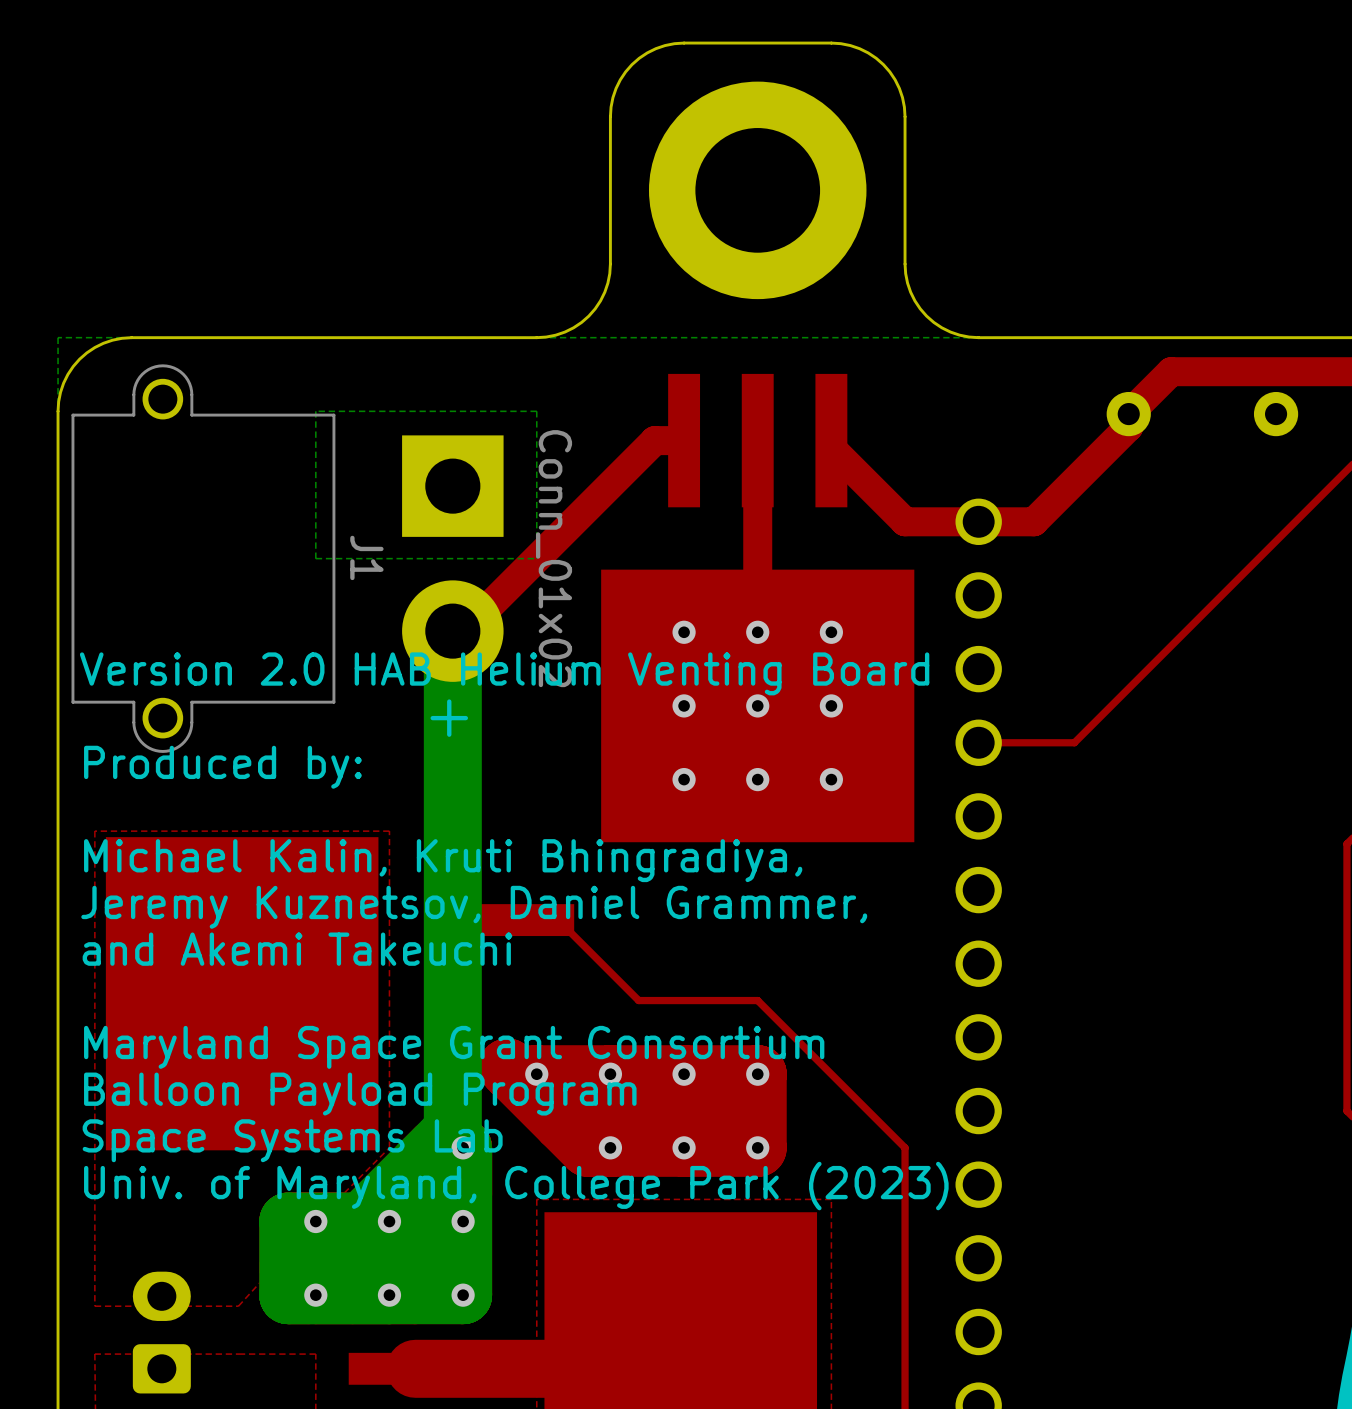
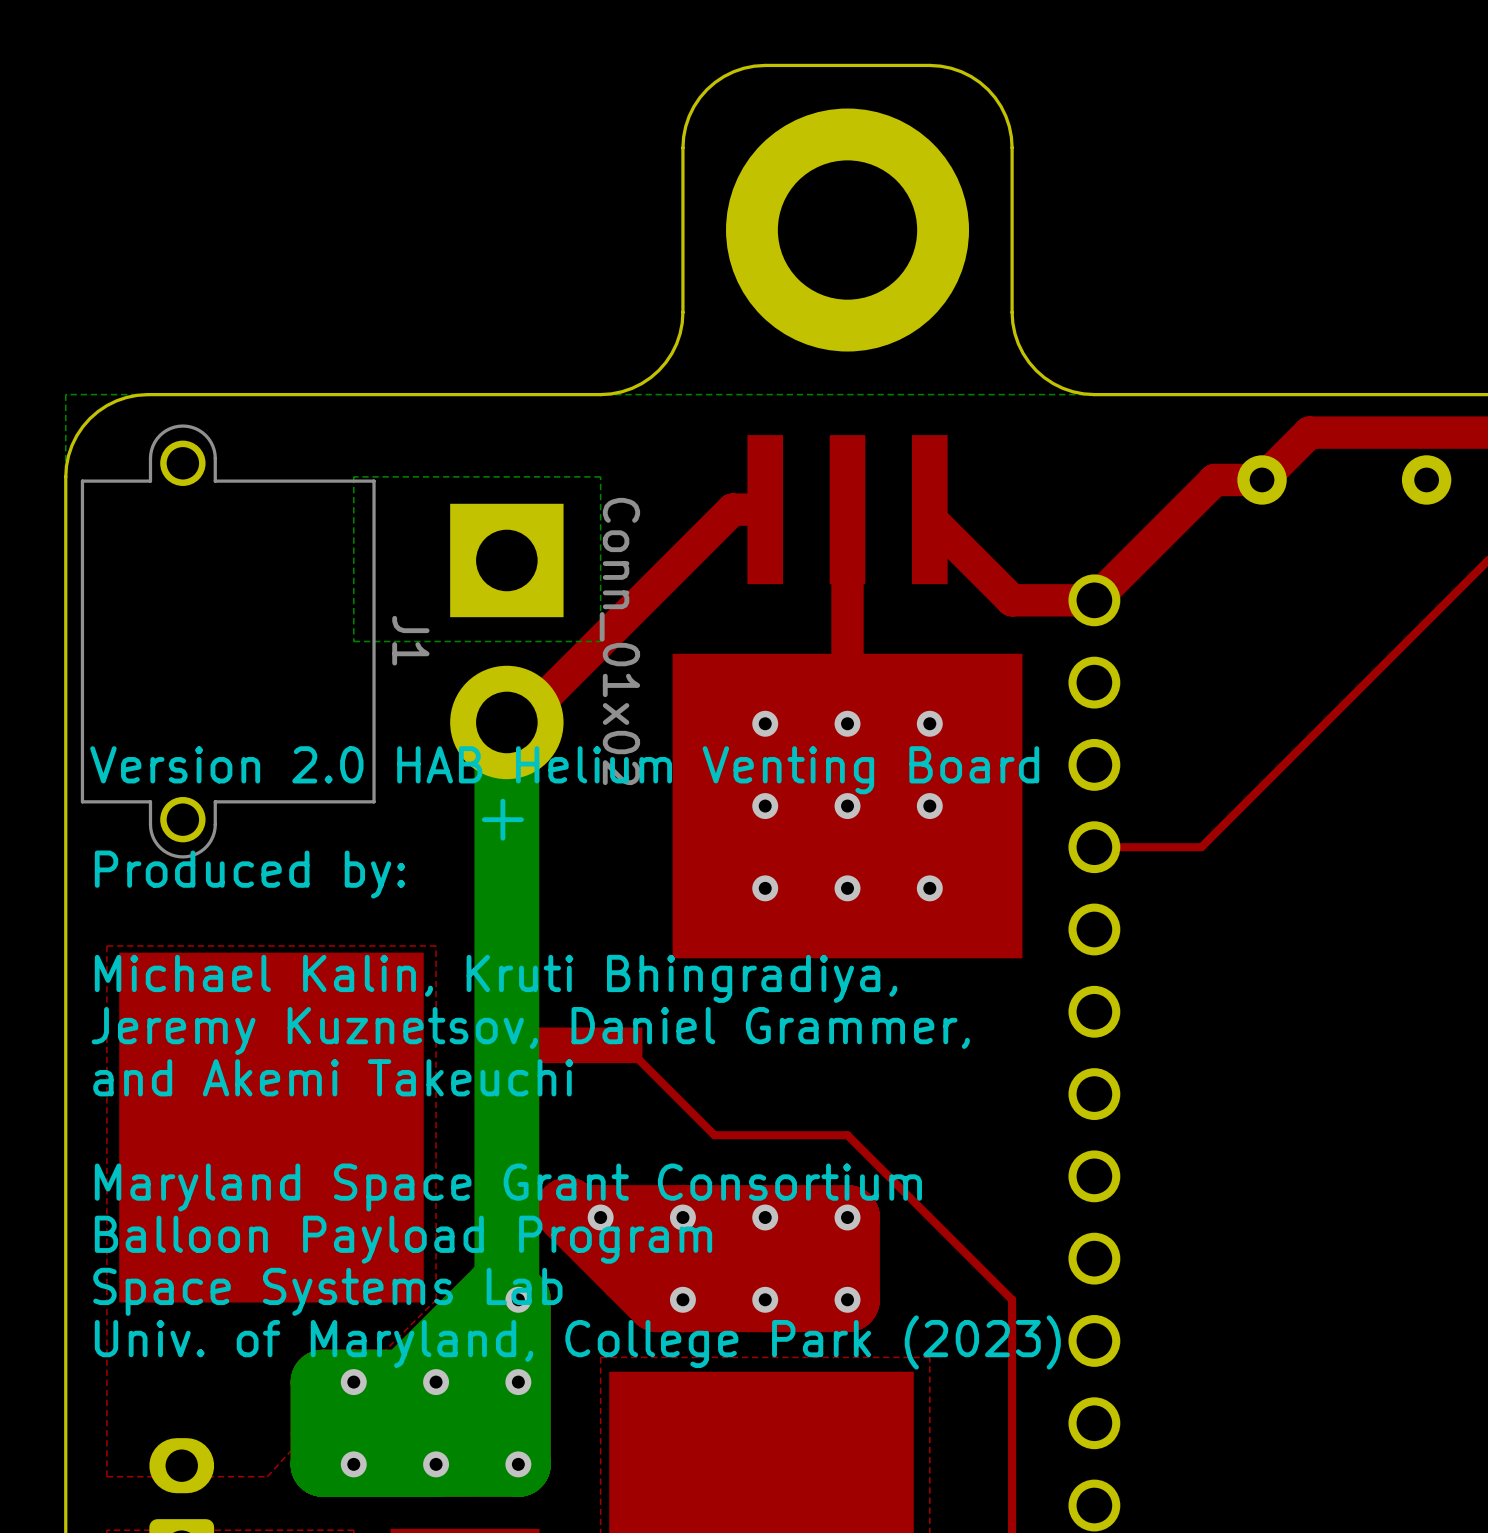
top track: (1128, 414) (1128, 426) (1033, 521) (978, 521) -> (1262, 479) (1214, 479) (1094, 600)

